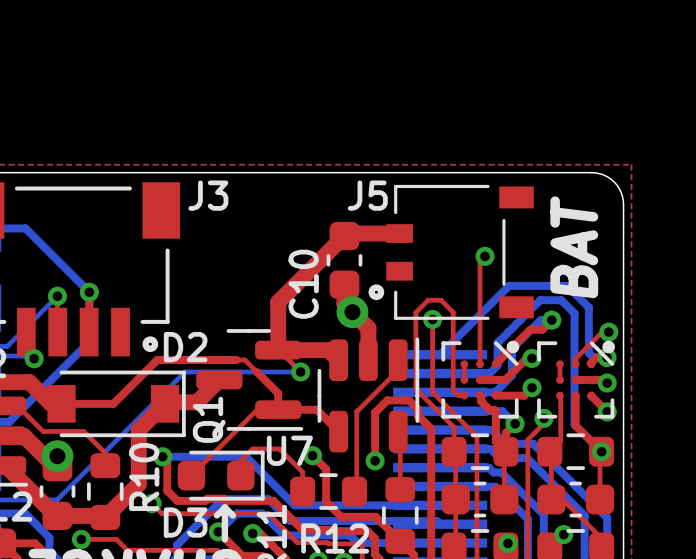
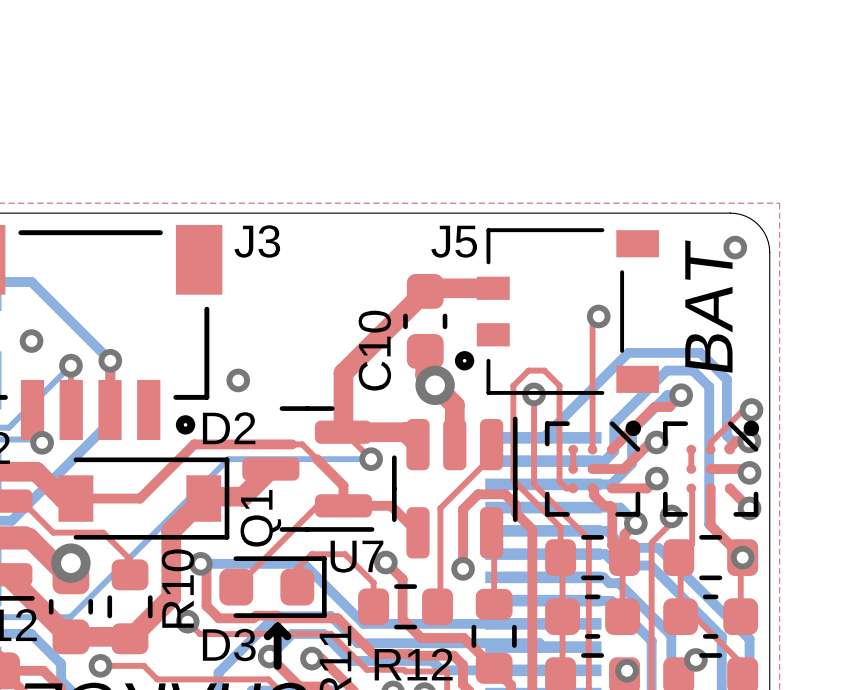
via: none -> (735, 247)
via: none -> (31, 341)
via: none -> (238, 380)

